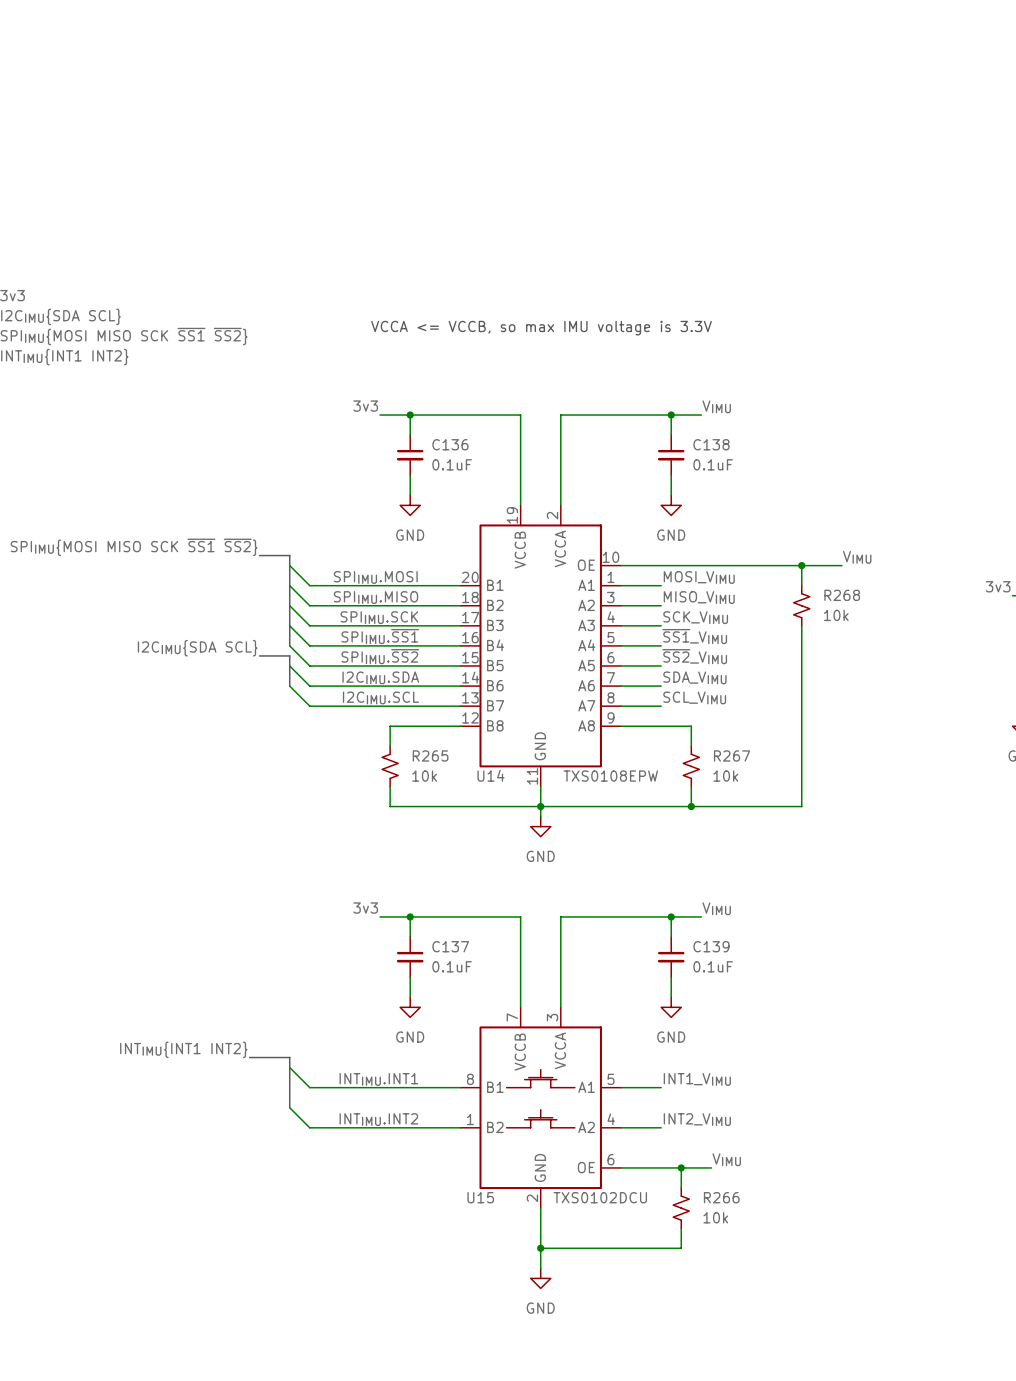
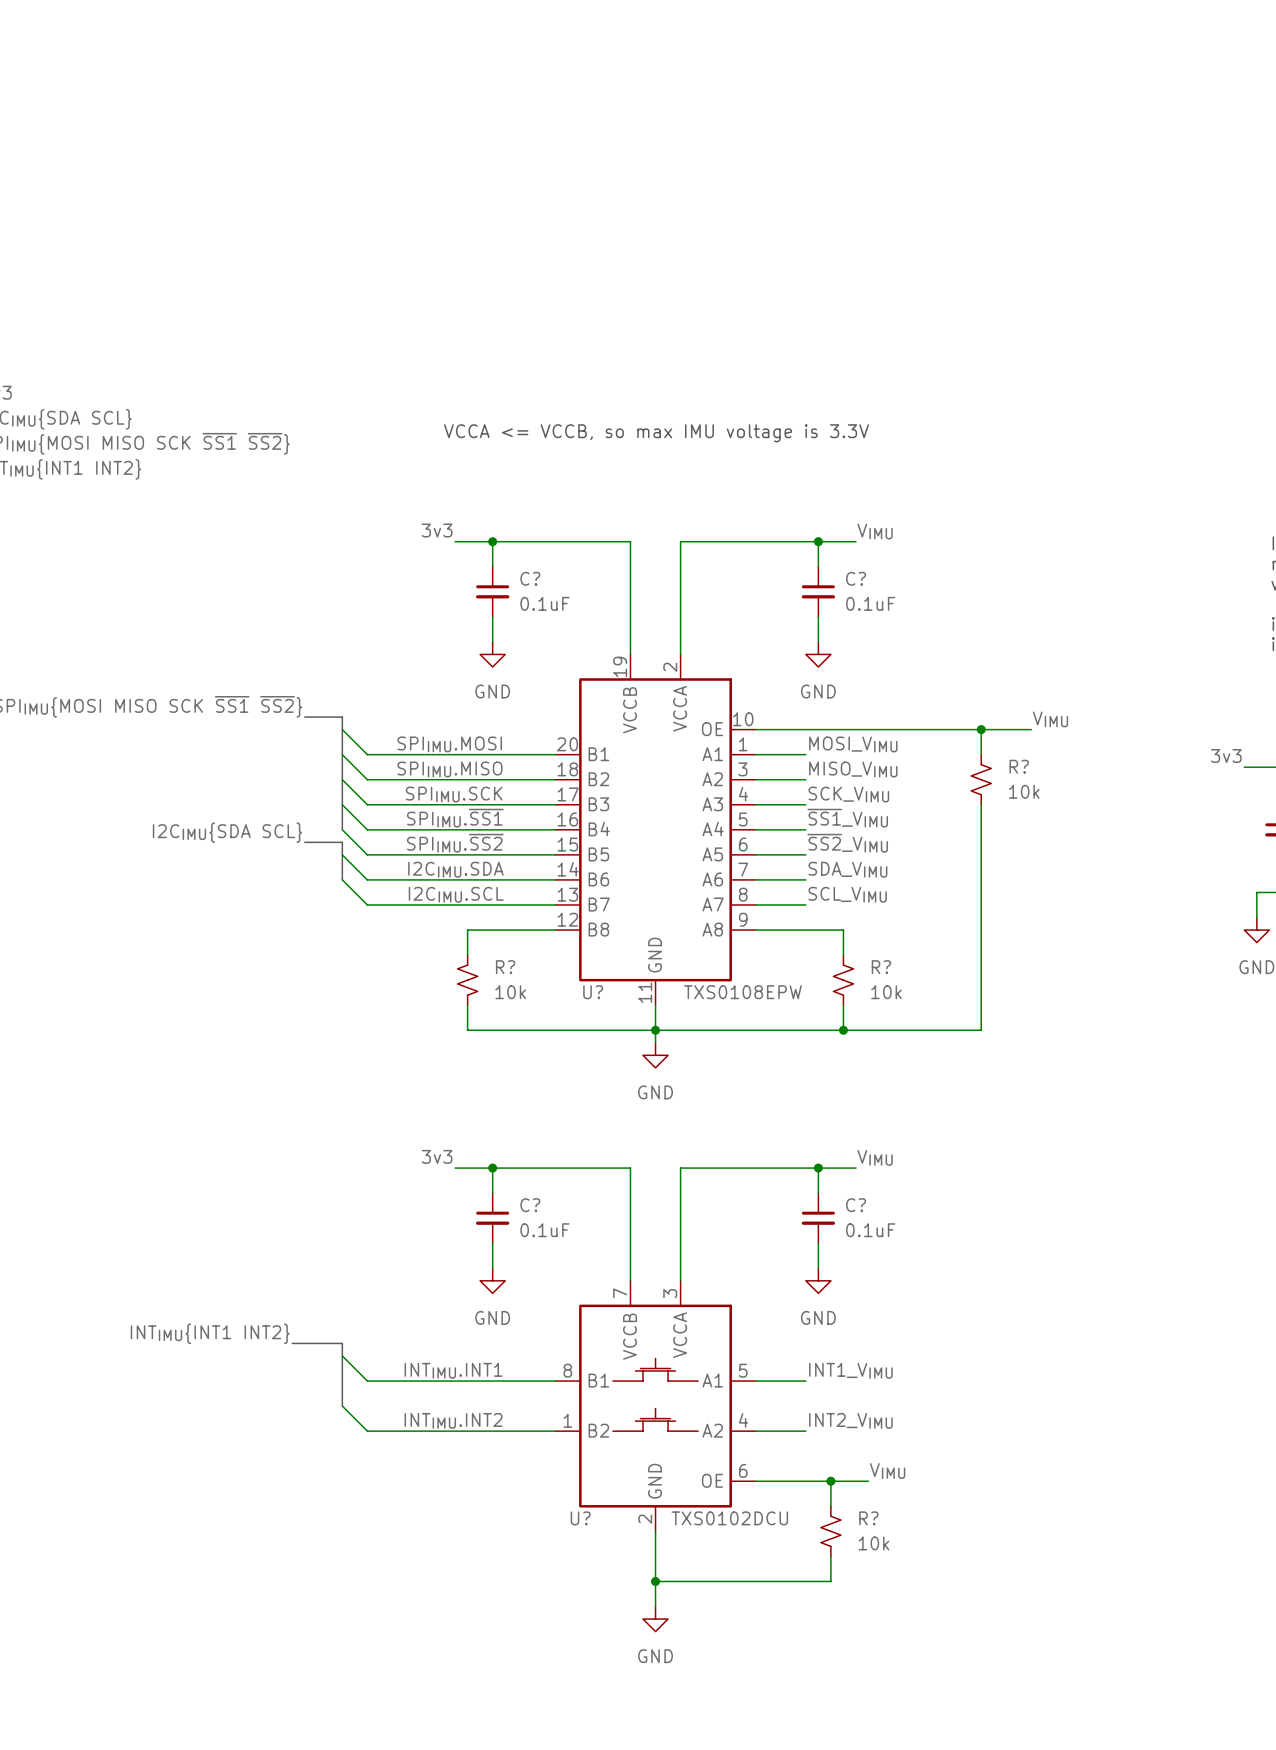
C136 name: C136 (450, 444) -> C? (530, 578)
C138 name: C138 (711, 444) -> C? (856, 578)
R268 name: R268 (842, 595) -> R? (1019, 766)
R265 name: R265 (430, 755) -> R? (505, 967)
R267 name: R267 (732, 755) -> R? (881, 967)
U14 name: U14 (491, 775) -> U? (593, 992)
C137 name: C137 (450, 946) -> C? (530, 1205)
C139 name: C139 (711, 946) -> C? (856, 1205)
U15 name: U15 (480, 1197) -> U? (580, 1518)
R266 name: R266 (721, 1197) -> R? (868, 1518)

